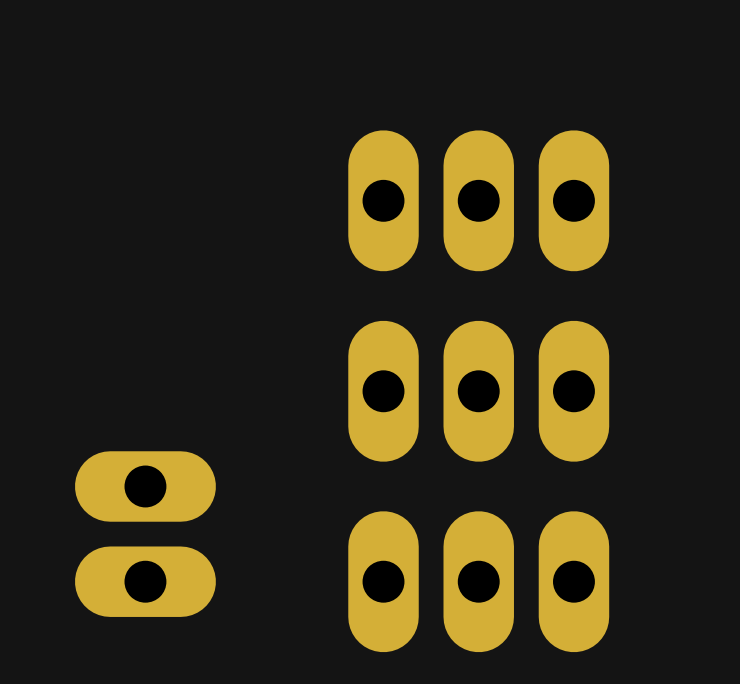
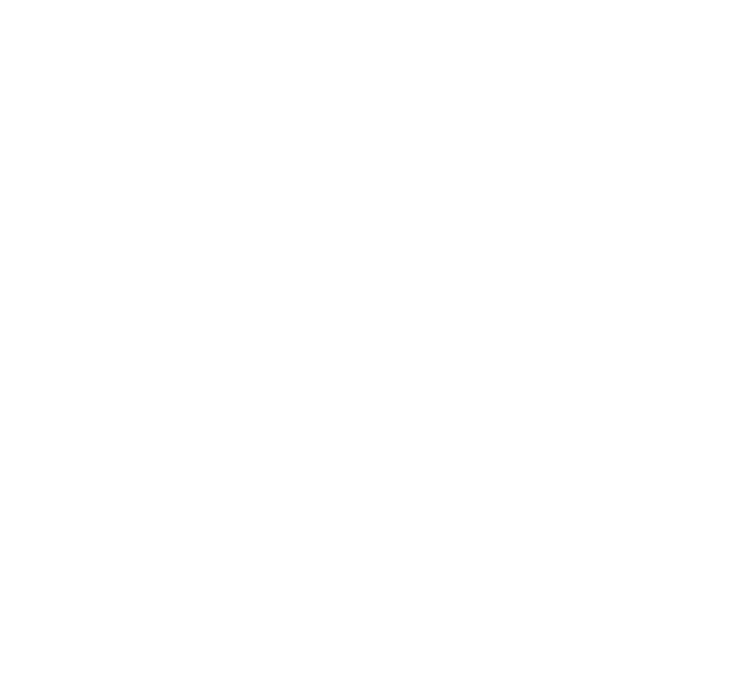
part: (478, 200) -> none
part: (478, 391) -> none
part: (145, 534) -> none
part: (478, 581) -> none

